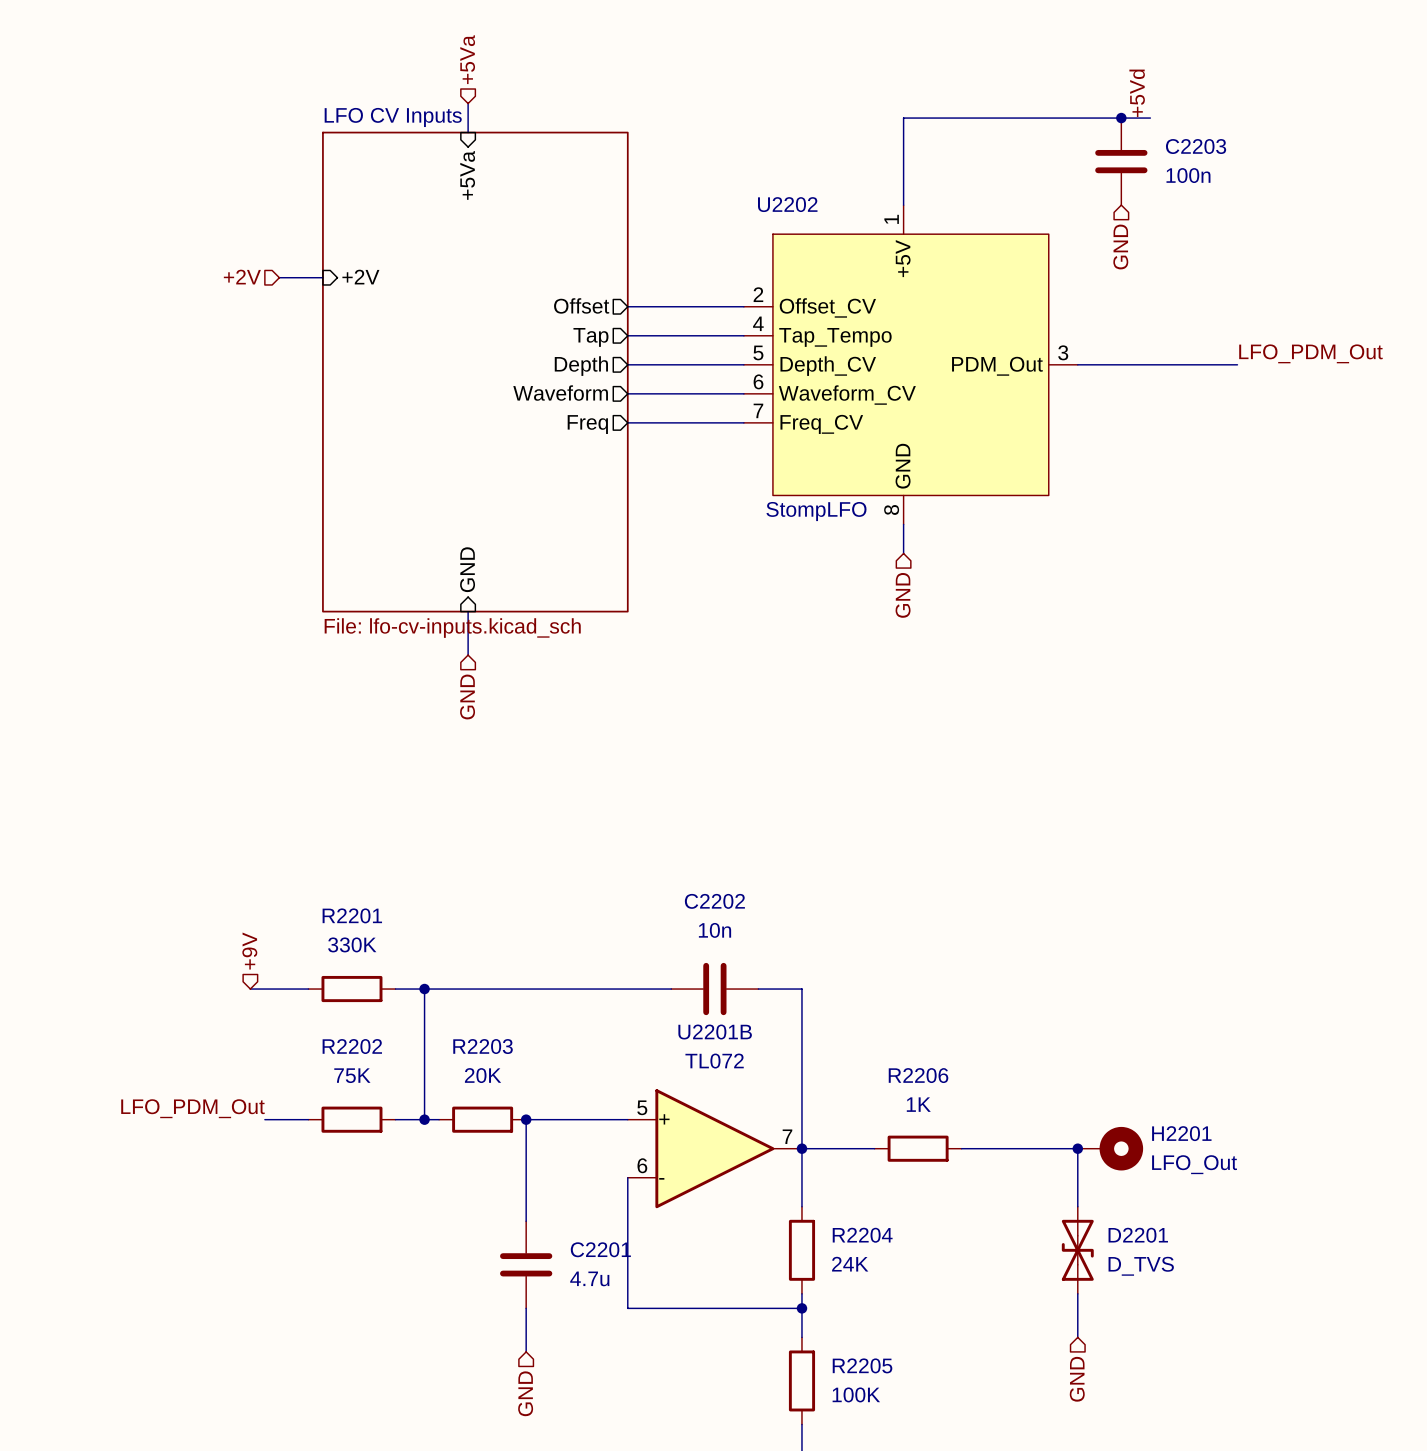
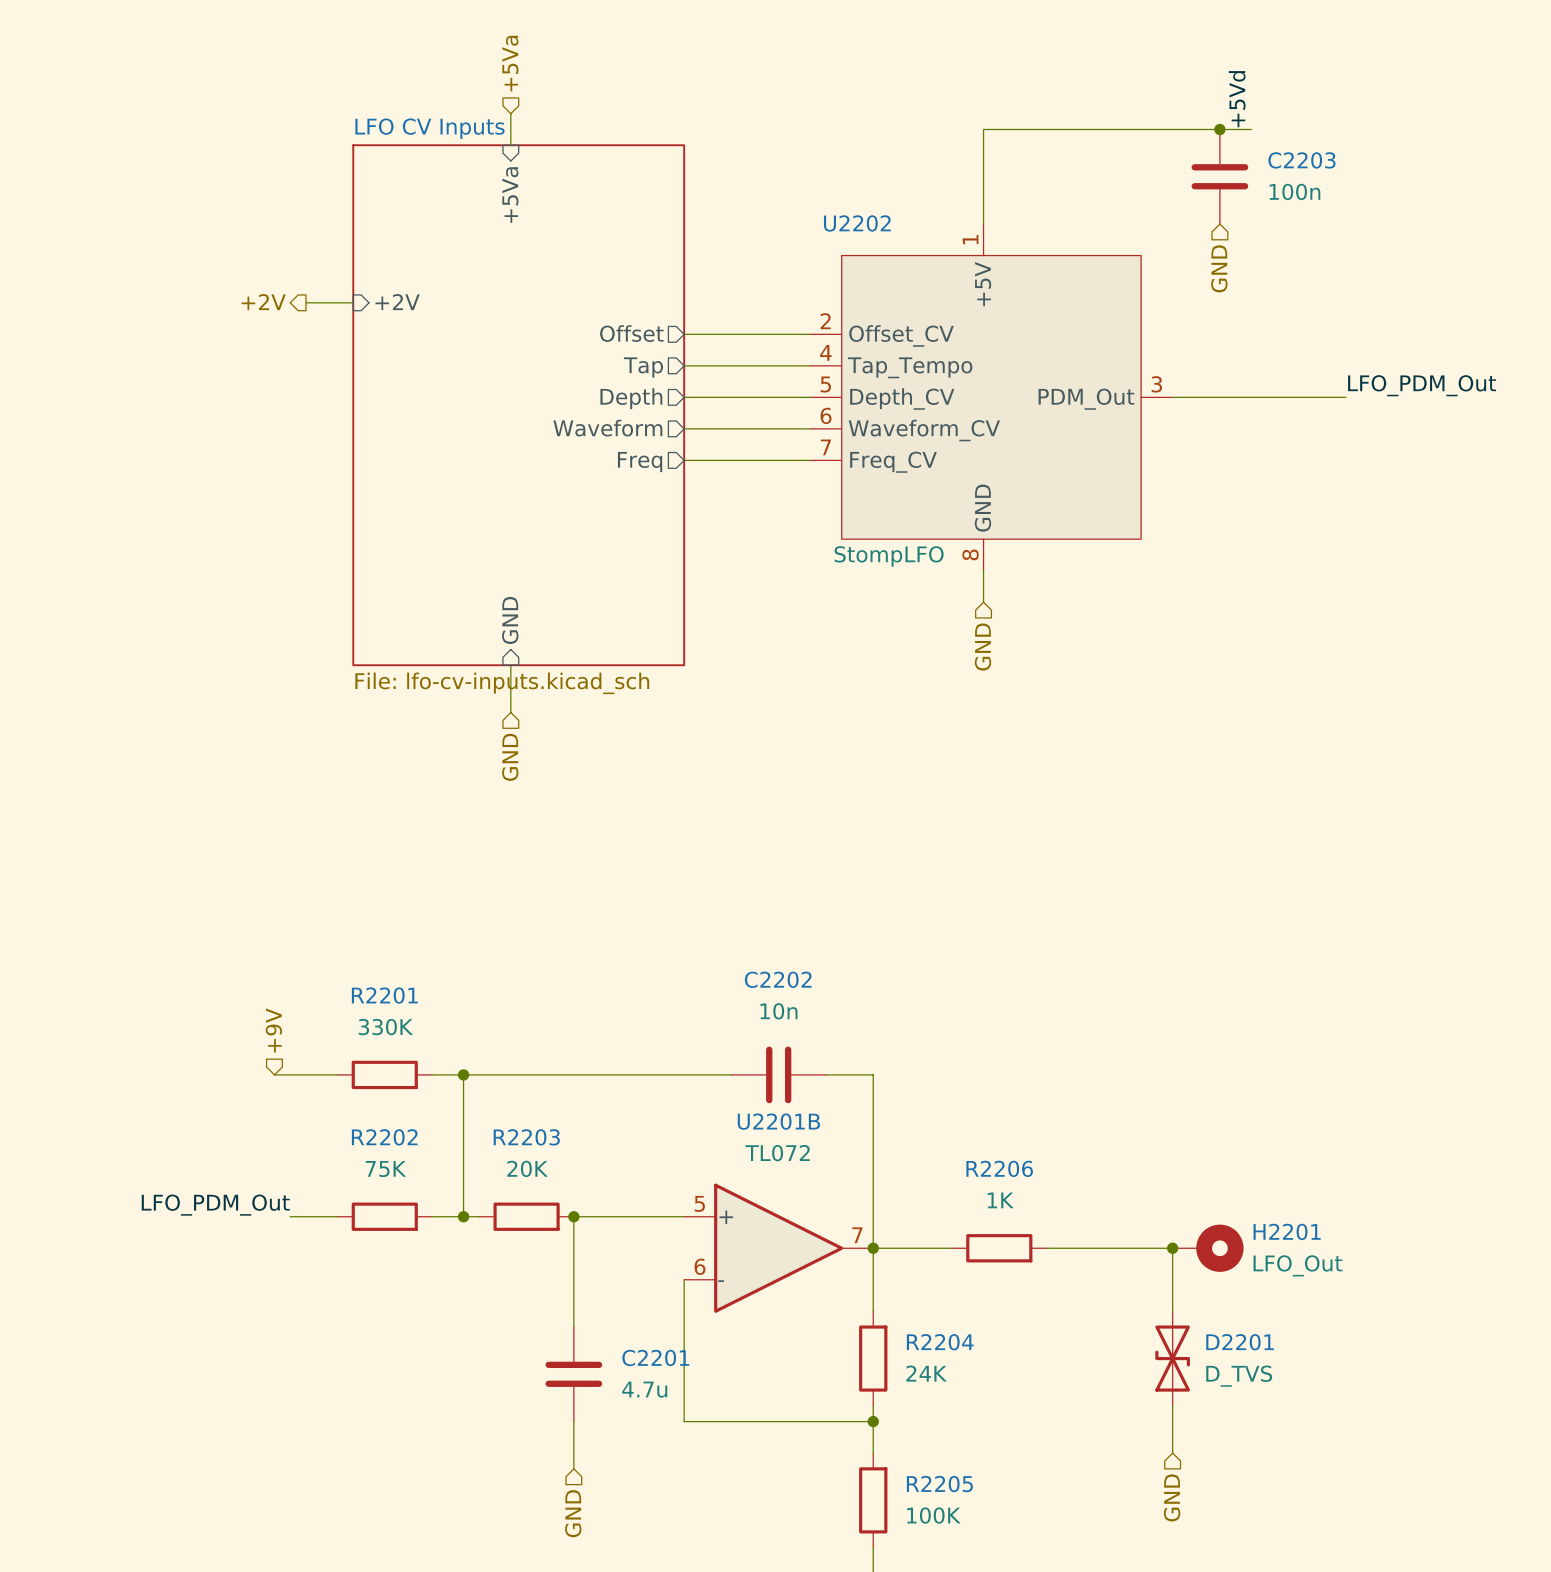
hierarchical label shape: input (242, 277) -> output (263, 302)

